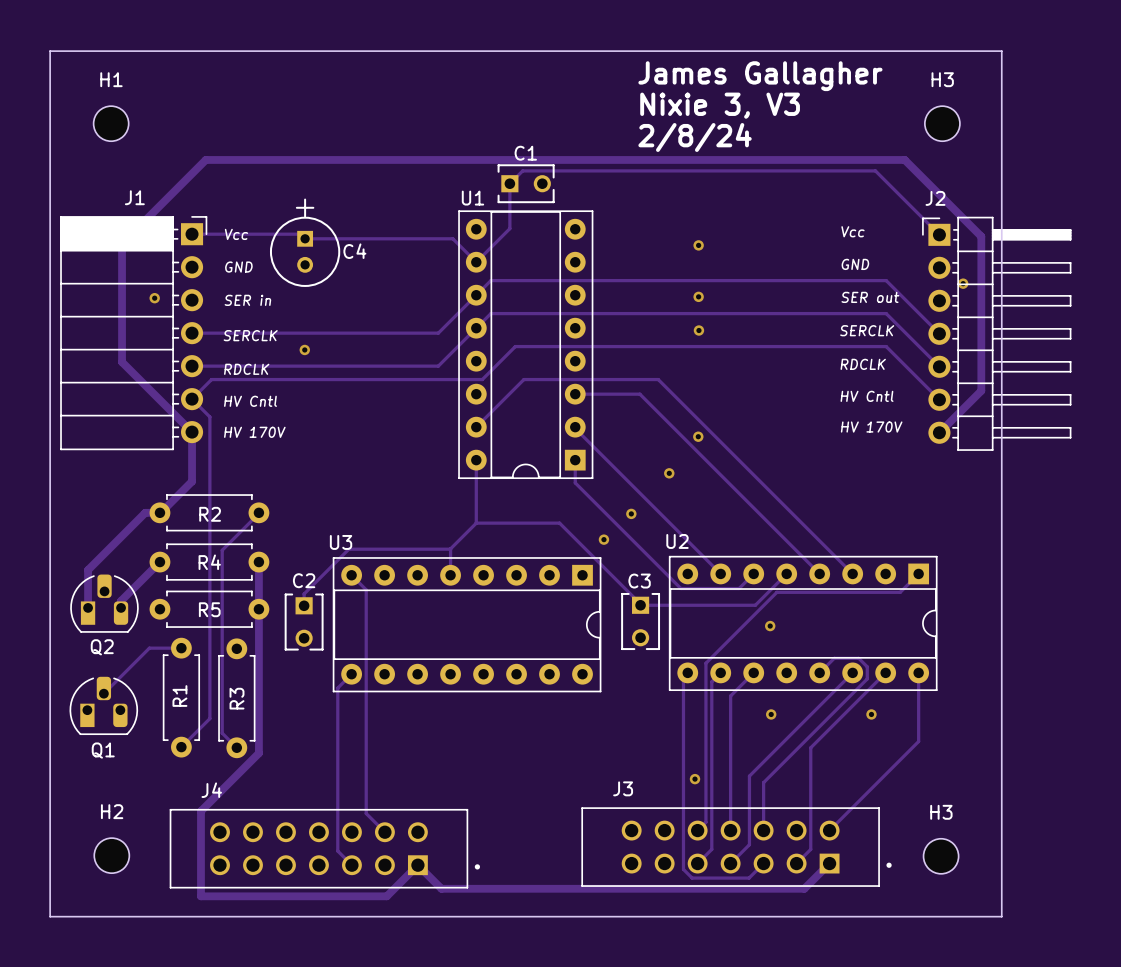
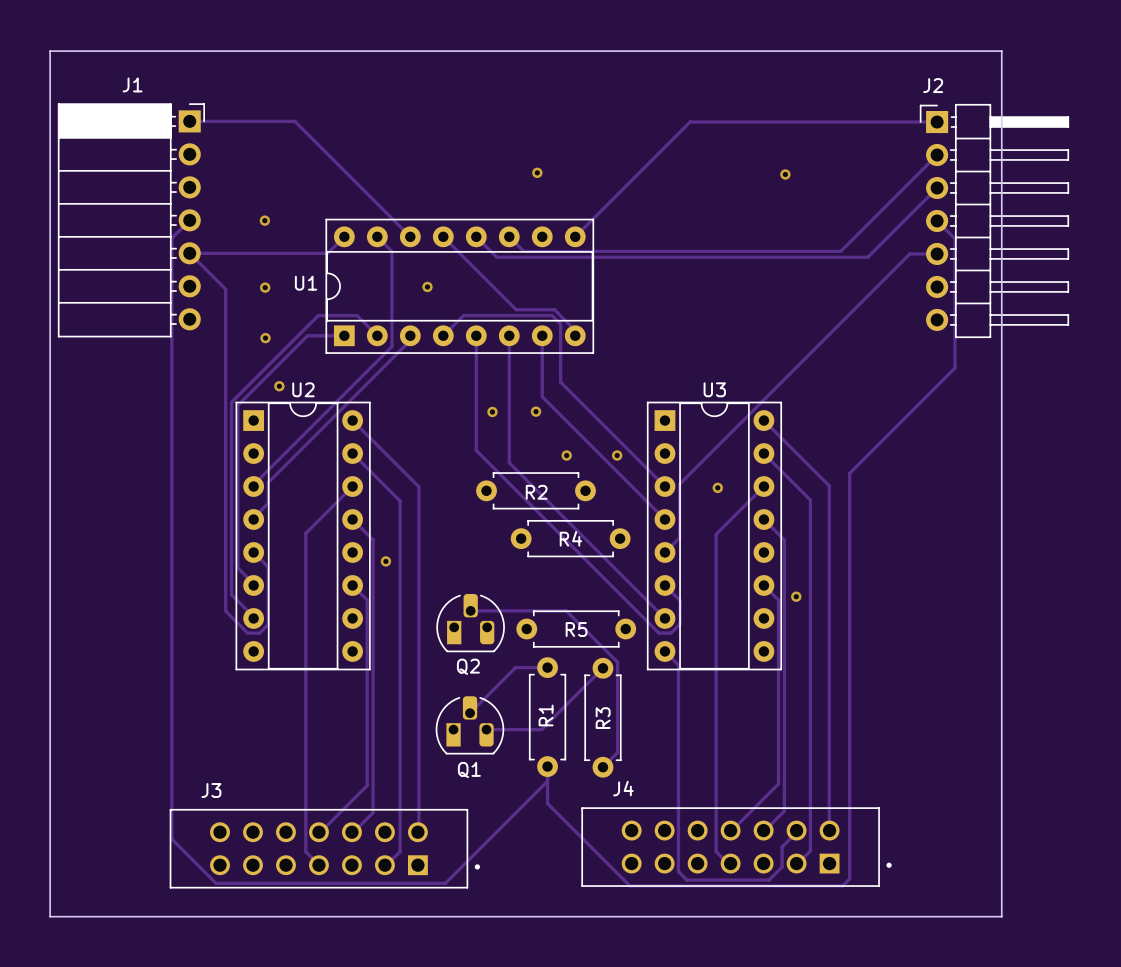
text: James Gallagher (760, 76) -> none
text: Nixie 3, V3 (720, 105) -> none
track: none -> (189, 121) (294, 121) (410, 236)
track: none -> (937, 122) (690, 122) (575, 236)
H1: (111, 123) -> none
H3: (942, 123) -> none
text: 2/8/24 (695, 137) -> none
track: none -> (937, 155) (840, 251) (523, 251) (509, 236)
via: none -> (537, 172)
via: none -> (785, 174)
C1: (526, 183) -> none
track: none -> (937, 188) (867, 257) (496, 257) (476, 236)
U1 name position: U1 (472, 198) -> U1 (306, 283)
track: none -> (189, 220) (171, 238) (171, 839) (216, 883) (445, 883) (547, 781)
via: none -> (264, 220)
track: none -> (937, 220) (954, 238) (954, 368) (849, 473) (849, 878) (842, 885) (629, 885) (547, 803) (547, 766)
text: Vcc (852, 231) -> none
track: (192, 234) (300, 234) (305, 238) (452, 238) (476, 262) (509, 228) (509, 183) (522, 170) (875, 170) (939, 234) -> none
text: Vcc (236, 234) -> none
track: none -> (344, 236) (327, 253) (189, 253) (225, 289) (225, 611) (247, 633) (259, 633) (268, 624) (268, 567) (253, 552)
track: none -> (377, 236) (391, 251) (391, 346) (253, 484)
track: none -> (443, 236) (516, 309) (554, 309) (575, 330) (575, 335)
C4: (305, 242) -> none
via: (698, 245) -> none
track: none -> (937, 253) (909, 253) (679, 484) (679, 537) (664, 552)
text: GND (855, 264) -> none
text: GND (238, 267) -> none
via: (963, 283) -> none
via: none -> (427, 286)
via: none -> (265, 287)
via: (698, 296) -> none
text: SER out (870, 297) -> none
via: (154, 298) -> none
text: SER in (247, 300) -> none
via: (698, 330) -> none
text: SERCLK (867, 330) -> none
J1 position: (133, 333) -> (131, 220)
track: (192, 333) (438, 333) (490, 280) (886, 280) (939, 333) -> none
J2 position: (996, 333) -> (994, 220)
text: SERCLK (250, 335) -> none
track: none -> (344, 335) (307, 335) (237, 405) (237, 568) (253, 583)
track: none -> (377, 335) (357, 315) (318, 315) (231, 402) (231, 594) (253, 616)
track: none -> (410, 335) (410, 340) (268, 482) (268, 503) (253, 517)
track: none -> (443, 335) (463, 315) (552, 315) (560, 324) (560, 382) (664, 486)
track: none -> (476, 335) (476, 450) (658, 633) (671, 633) (680, 623) (680, 600) (664, 585)
track: none -> (509, 335) (509, 462) (664, 618)
track: none -> (542, 335) (542, 396) (664, 519)
via: none -> (265, 338)
U1 rotation: 0° (525, 344) -> 90° clockwise (459, 286)
via: (304, 349) -> none
text: RDCLK (863, 364) -> none
track: (192, 366) (438, 366) (490, 313) (886, 313) (939, 366) -> none
text: RDCLK (246, 369) -> none
via: none -> (279, 386)
track: (575, 394) (639, 394) (819, 573) -> none
text: HV Cntl (867, 396) -> none
track: (939, 399) (886, 346) (515, 346) (482, 379) (211, 379) (192, 399) (209, 416) (209, 718) (181, 747) -> none
text: HV Cntl (250, 401) -> none
via: none -> (492, 411)
via: none -> (536, 411)
track: none -> (352, 420) (418, 486) (418, 832)
track: none -> (763, 420) (829, 485) (829, 832)
track: (476, 427) (523, 379) (658, 379) (852, 573) -> none
track: (575, 427) (720, 573) -> none
text: HV 170V (871, 427) -> none
text: HV 170V (254, 432) -> none
track: (939, 432) (981, 390) (981, 236) (904, 159) (205, 159) (122, 243) (122, 362) (192, 432) (192, 481) (160, 512) -> none
via: (698, 436) -> none
track: none -> (352, 453) (400, 501) (400, 851) (385, 865)
track: none -> (763, 453) (810, 500) (810, 851) (796, 865)
via: none -> (566, 455)
via: none -> (617, 455)
track: (476, 460) (476, 523) -> none
track: (575, 460) (575, 482) (680, 588) (739, 588) (753, 573) -> none
via: (669, 473) -> none
track: none -> (352, 486) (305, 533) (305, 851) (319, 865)
track: none -> (763, 486) (716, 534) (716, 851) (730, 865)
via: none -> (717, 487)
track: (159, 512) (145, 512) (88, 570) (88, 607) -> none
R2 position: (209, 512) -> (536, 490)
track: (259, 512) (222, 550) (222, 733) (236, 747) -> none
via: (631, 513) -> none
track: none -> (352, 519) (373, 539) (373, 812) (352, 832)
track: none -> (763, 519) (784, 539) (784, 811) (763, 832)
track: (476, 523) (559, 523) (640, 605) (755, 605) (786, 573) -> none
track: (476, 523) (450, 549) -> none
via: (603, 539) -> none
U2 name position: U2 (677, 541) -> U2 (303, 389)
U3 name position: U3 (341, 542) -> U3 (714, 389)
via: none -> (385, 561)
track: (159, 562) (121, 600) (121, 607) -> none
R4 position: (209, 562) -> (570, 538)
track: (258, 562) (258, 753) (200, 811) (200, 896) (386, 896) (417, 865) (441, 888) (804, 888) (829, 863) -> none
track: (918, 573) (900, 592) (776, 592) (705, 663) (705, 822) (697, 830) -> none
track: (351, 575) (366, 589) (366, 813) (384, 832) -> none
track: (450, 575) (450, 549) (348, 549) (304, 593) (304, 605) -> none
track: none -> (352, 585) (367, 600) (367, 785) (319, 832)
track: none -> (763, 585) (778, 600) (778, 783) (730, 832)
Q2 position: (104, 603) -> (470, 623)
R5 position: (209, 609) -> (576, 629)
track: none -> (470, 610) (566, 610) (617, 662) (617, 752) (602, 767)
C3: (640, 621) -> none
C2: (304, 622) -> none
U2 rotation: 0° (803, 623) -> 90° counterclockwise (303, 536)
U2 position: (803, 623) -> (303, 536)
U3 rotation: 0° (467, 624) -> 90° counterclockwise (714, 536)
U3 position: (467, 624) -> (714, 536)
via position: (770, 626) -> (796, 596)
track: (181, 648) (149, 648) (103, 693) -> none
track: none -> (664, 651) (678, 664) (678, 871) (686, 880) (769, 880) (782, 867) (782, 847) (796, 832)
track: none -> (547, 667) (515, 667) (470, 713)
track: none -> (602, 668) (541, 729) (486, 729)
track: (687, 672) (683, 677) (683, 869) (692, 878) (749, 878) (763, 863) -> none
track: (720, 672) (711, 681) (711, 849) (697, 863) -> none
track: (753, 672) (730, 695) (730, 830) -> none
track: (819, 672) (834, 658) (858, 658) (867, 666) (867, 678) (763, 782) (763, 830) -> none
track: (852, 672) (749, 776) (749, 844) (730, 863) -> none
track: (885, 672) (810, 747) (810, 849) (796, 863) -> none
track: (918, 672) (918, 741) (829, 830) -> none
track: (351, 674) (337, 688) (337, 851) (351, 865) -> none
R1 position: (181, 697) -> (547, 717)
R3 position: (236, 698) -> (602, 717)
Q1 position: (103, 705) -> (469, 725)
via: (771, 714) -> none
via: (871, 714) -> none
via: (695, 779) -> none
J3 name: J3 (623, 788) -> J4 (623, 788)
J4 name: J4 (211, 790) -> J3 (211, 790)
H2: (111, 855) -> none
H3: (941, 856) -> none

